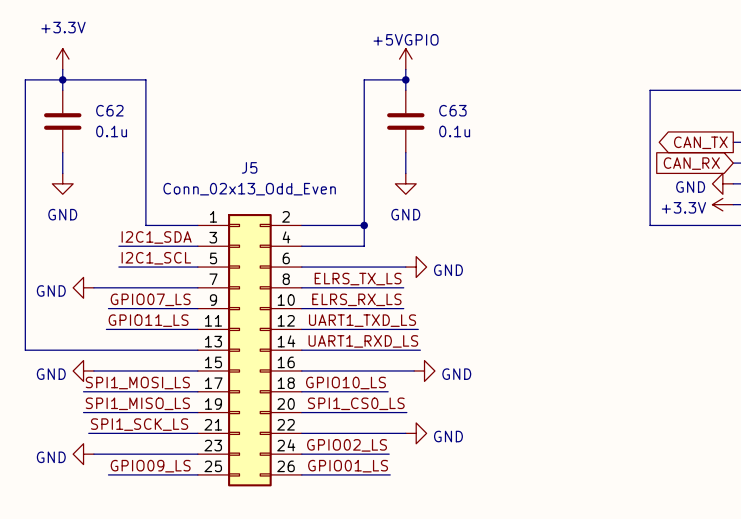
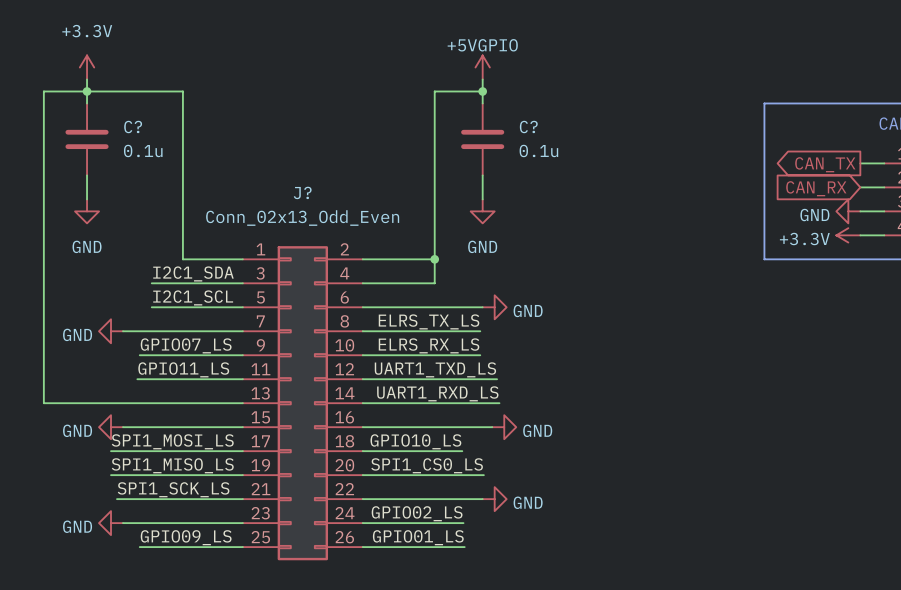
C62 name: C62 (109, 110) -> C? (133, 127)
C63 name: C63 (452, 110) -> C? (528, 127)
J5 name: J5 (249, 167) -> J? (302, 192)

